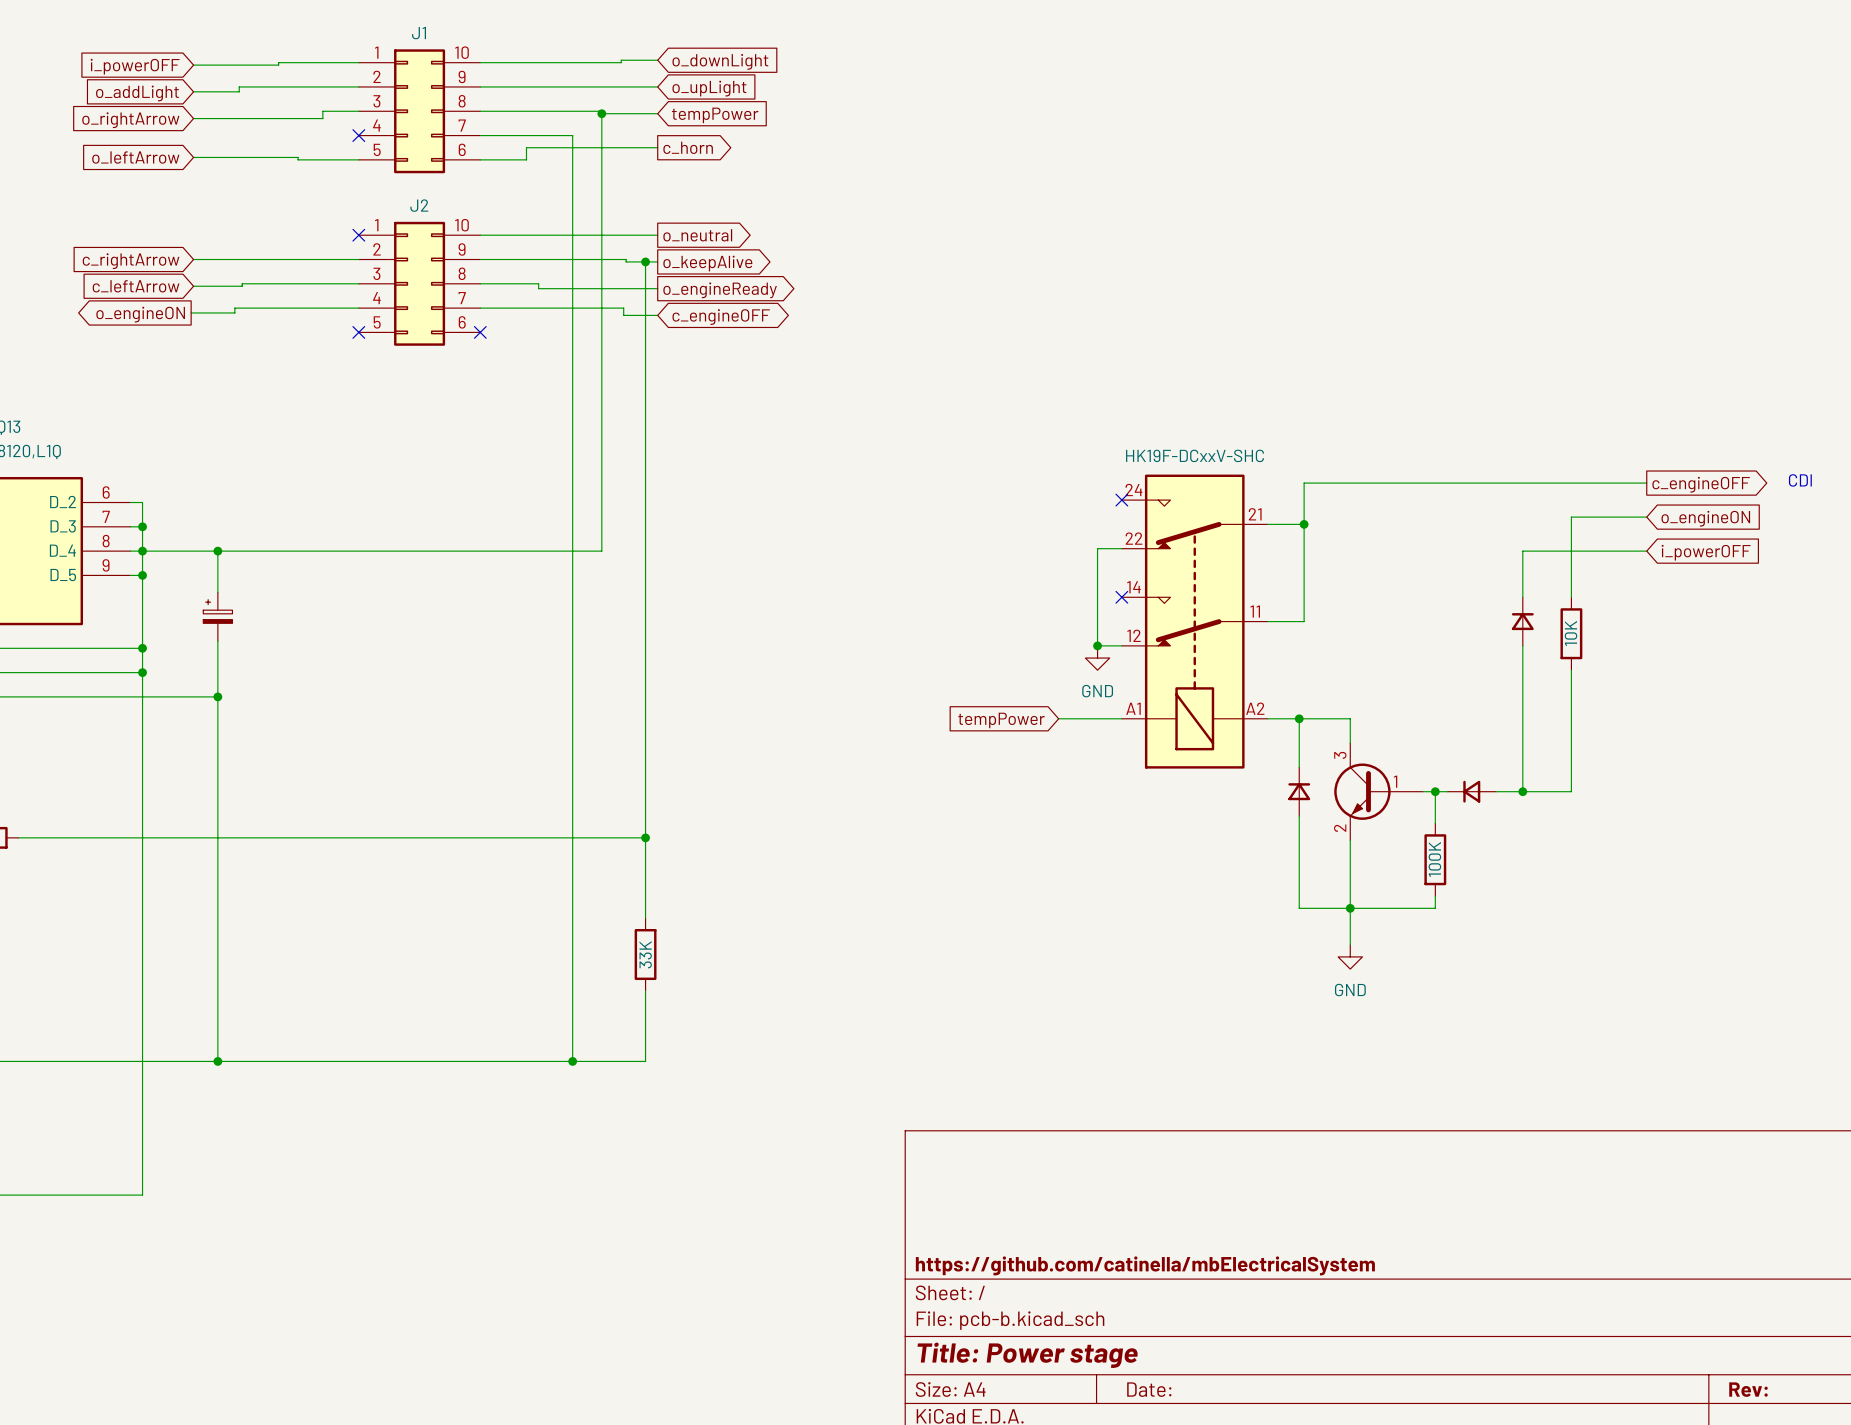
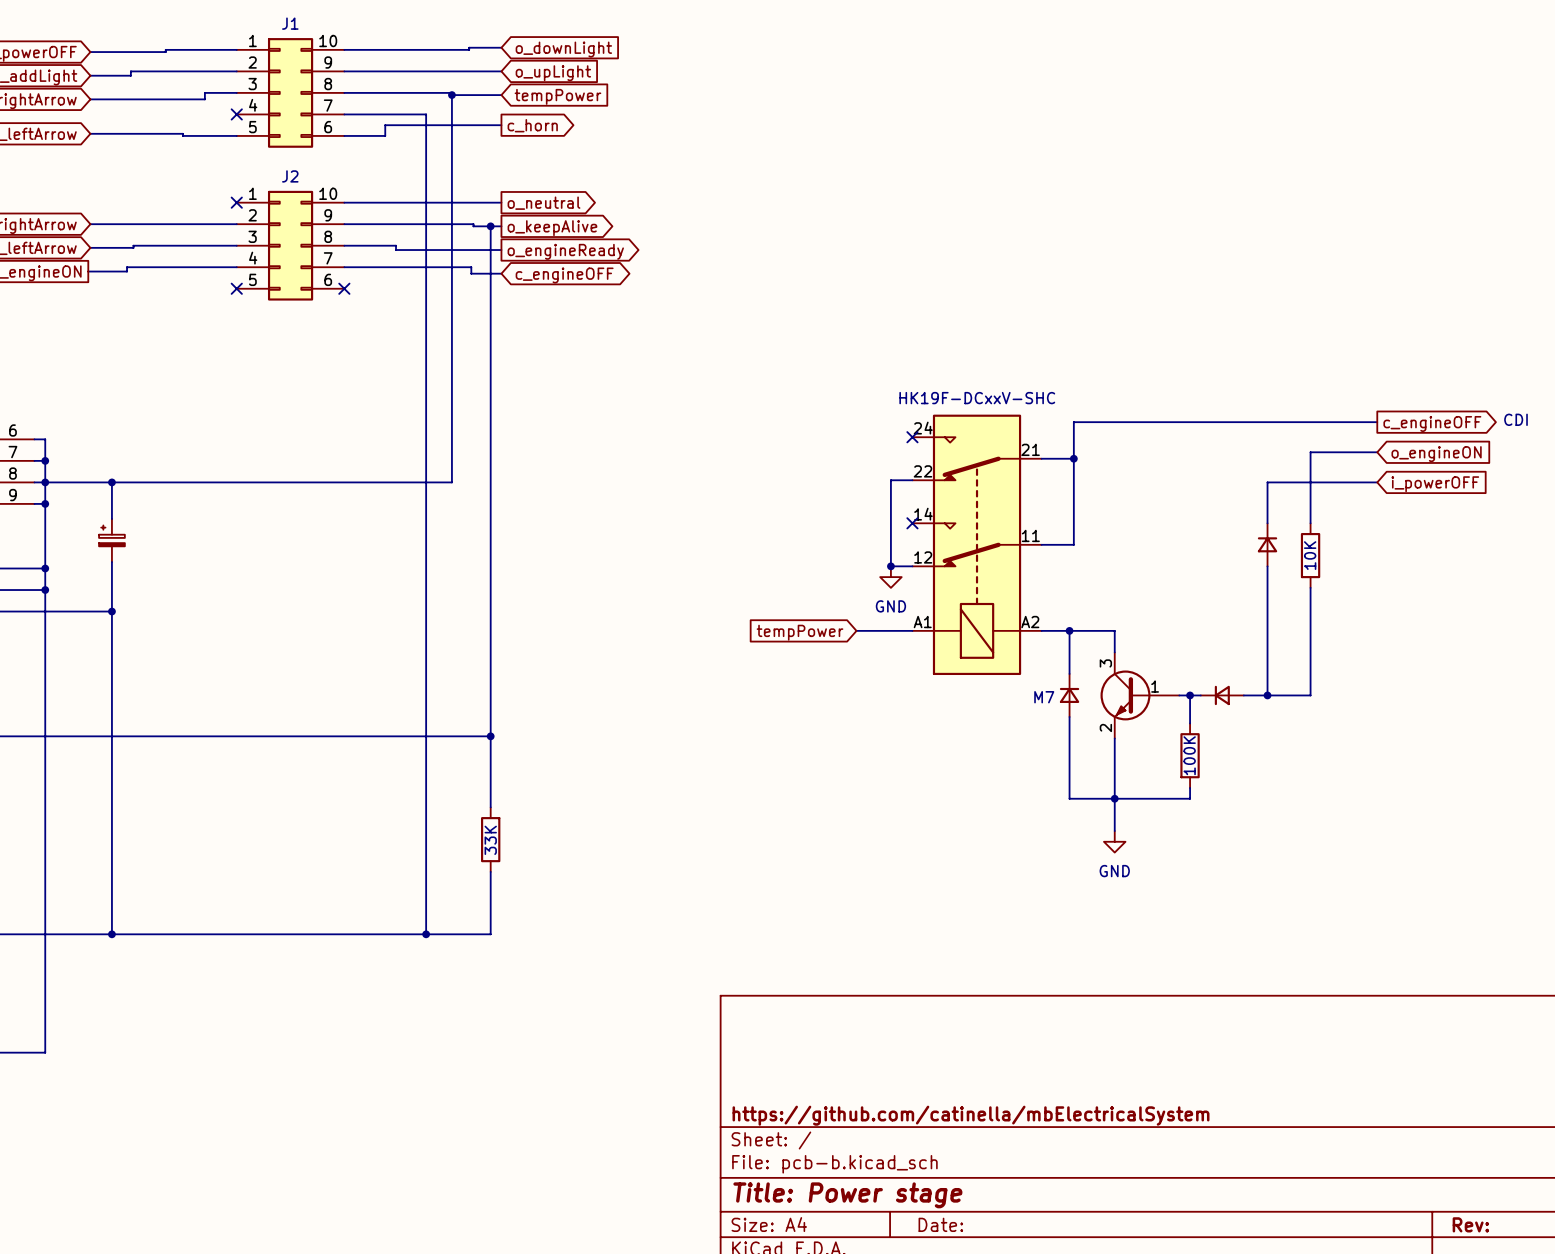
part value: none -> M7 (1044, 697)

